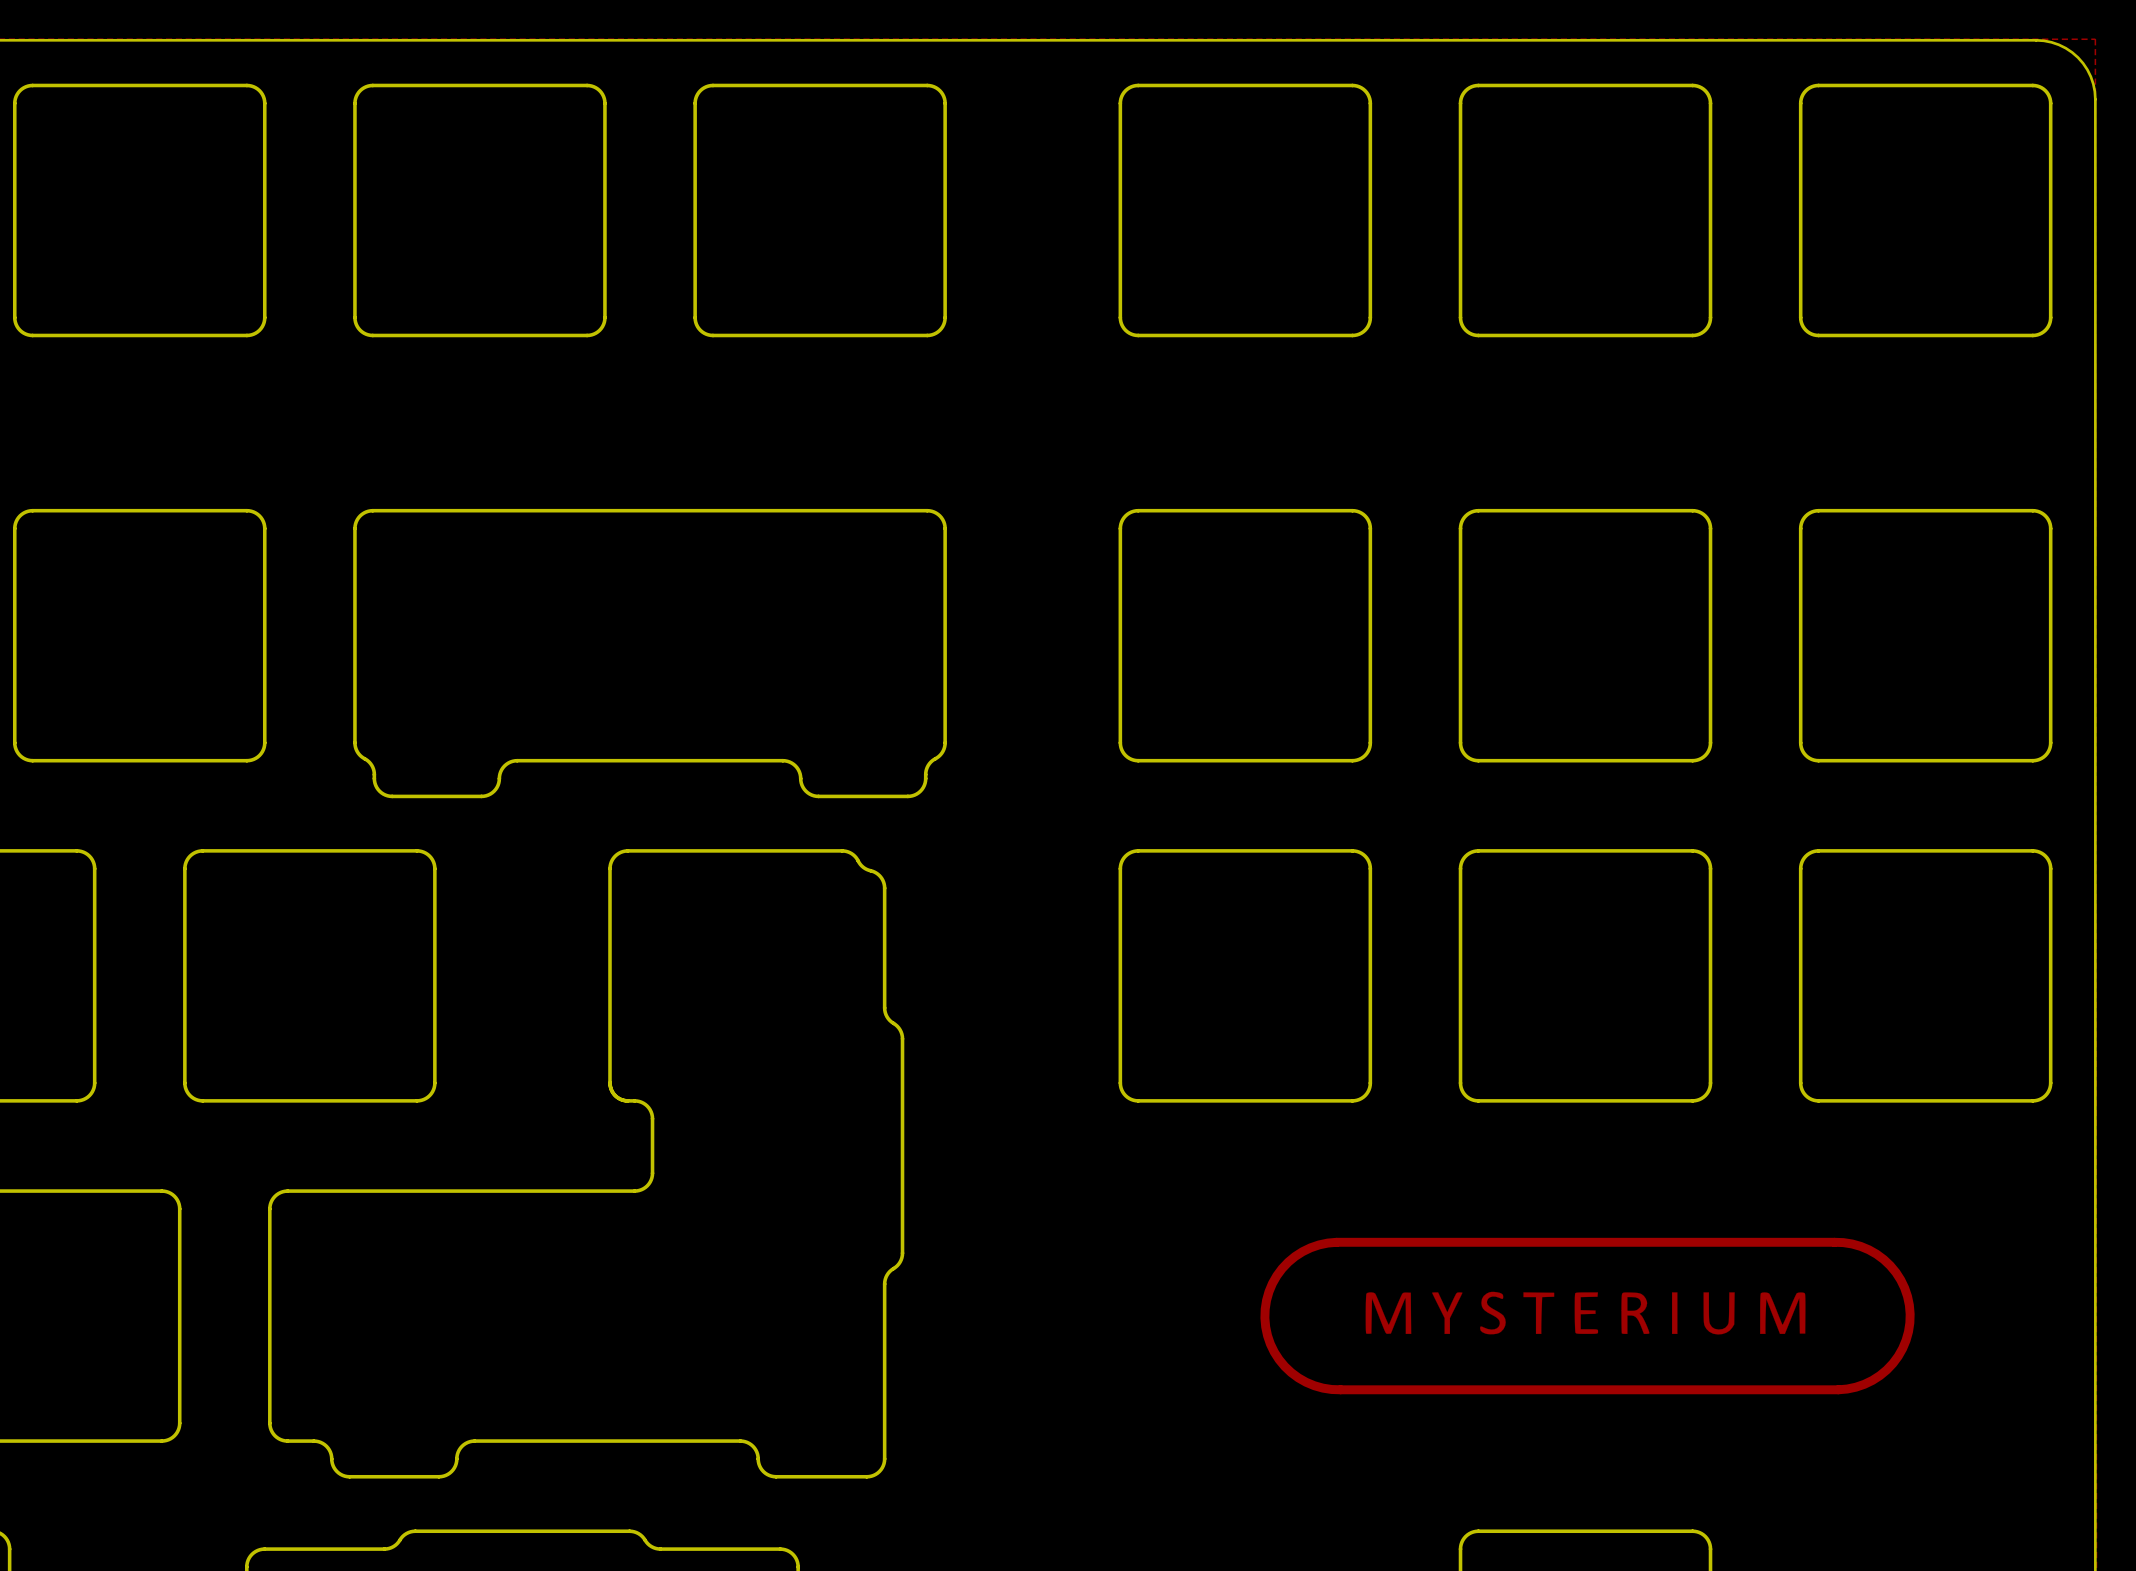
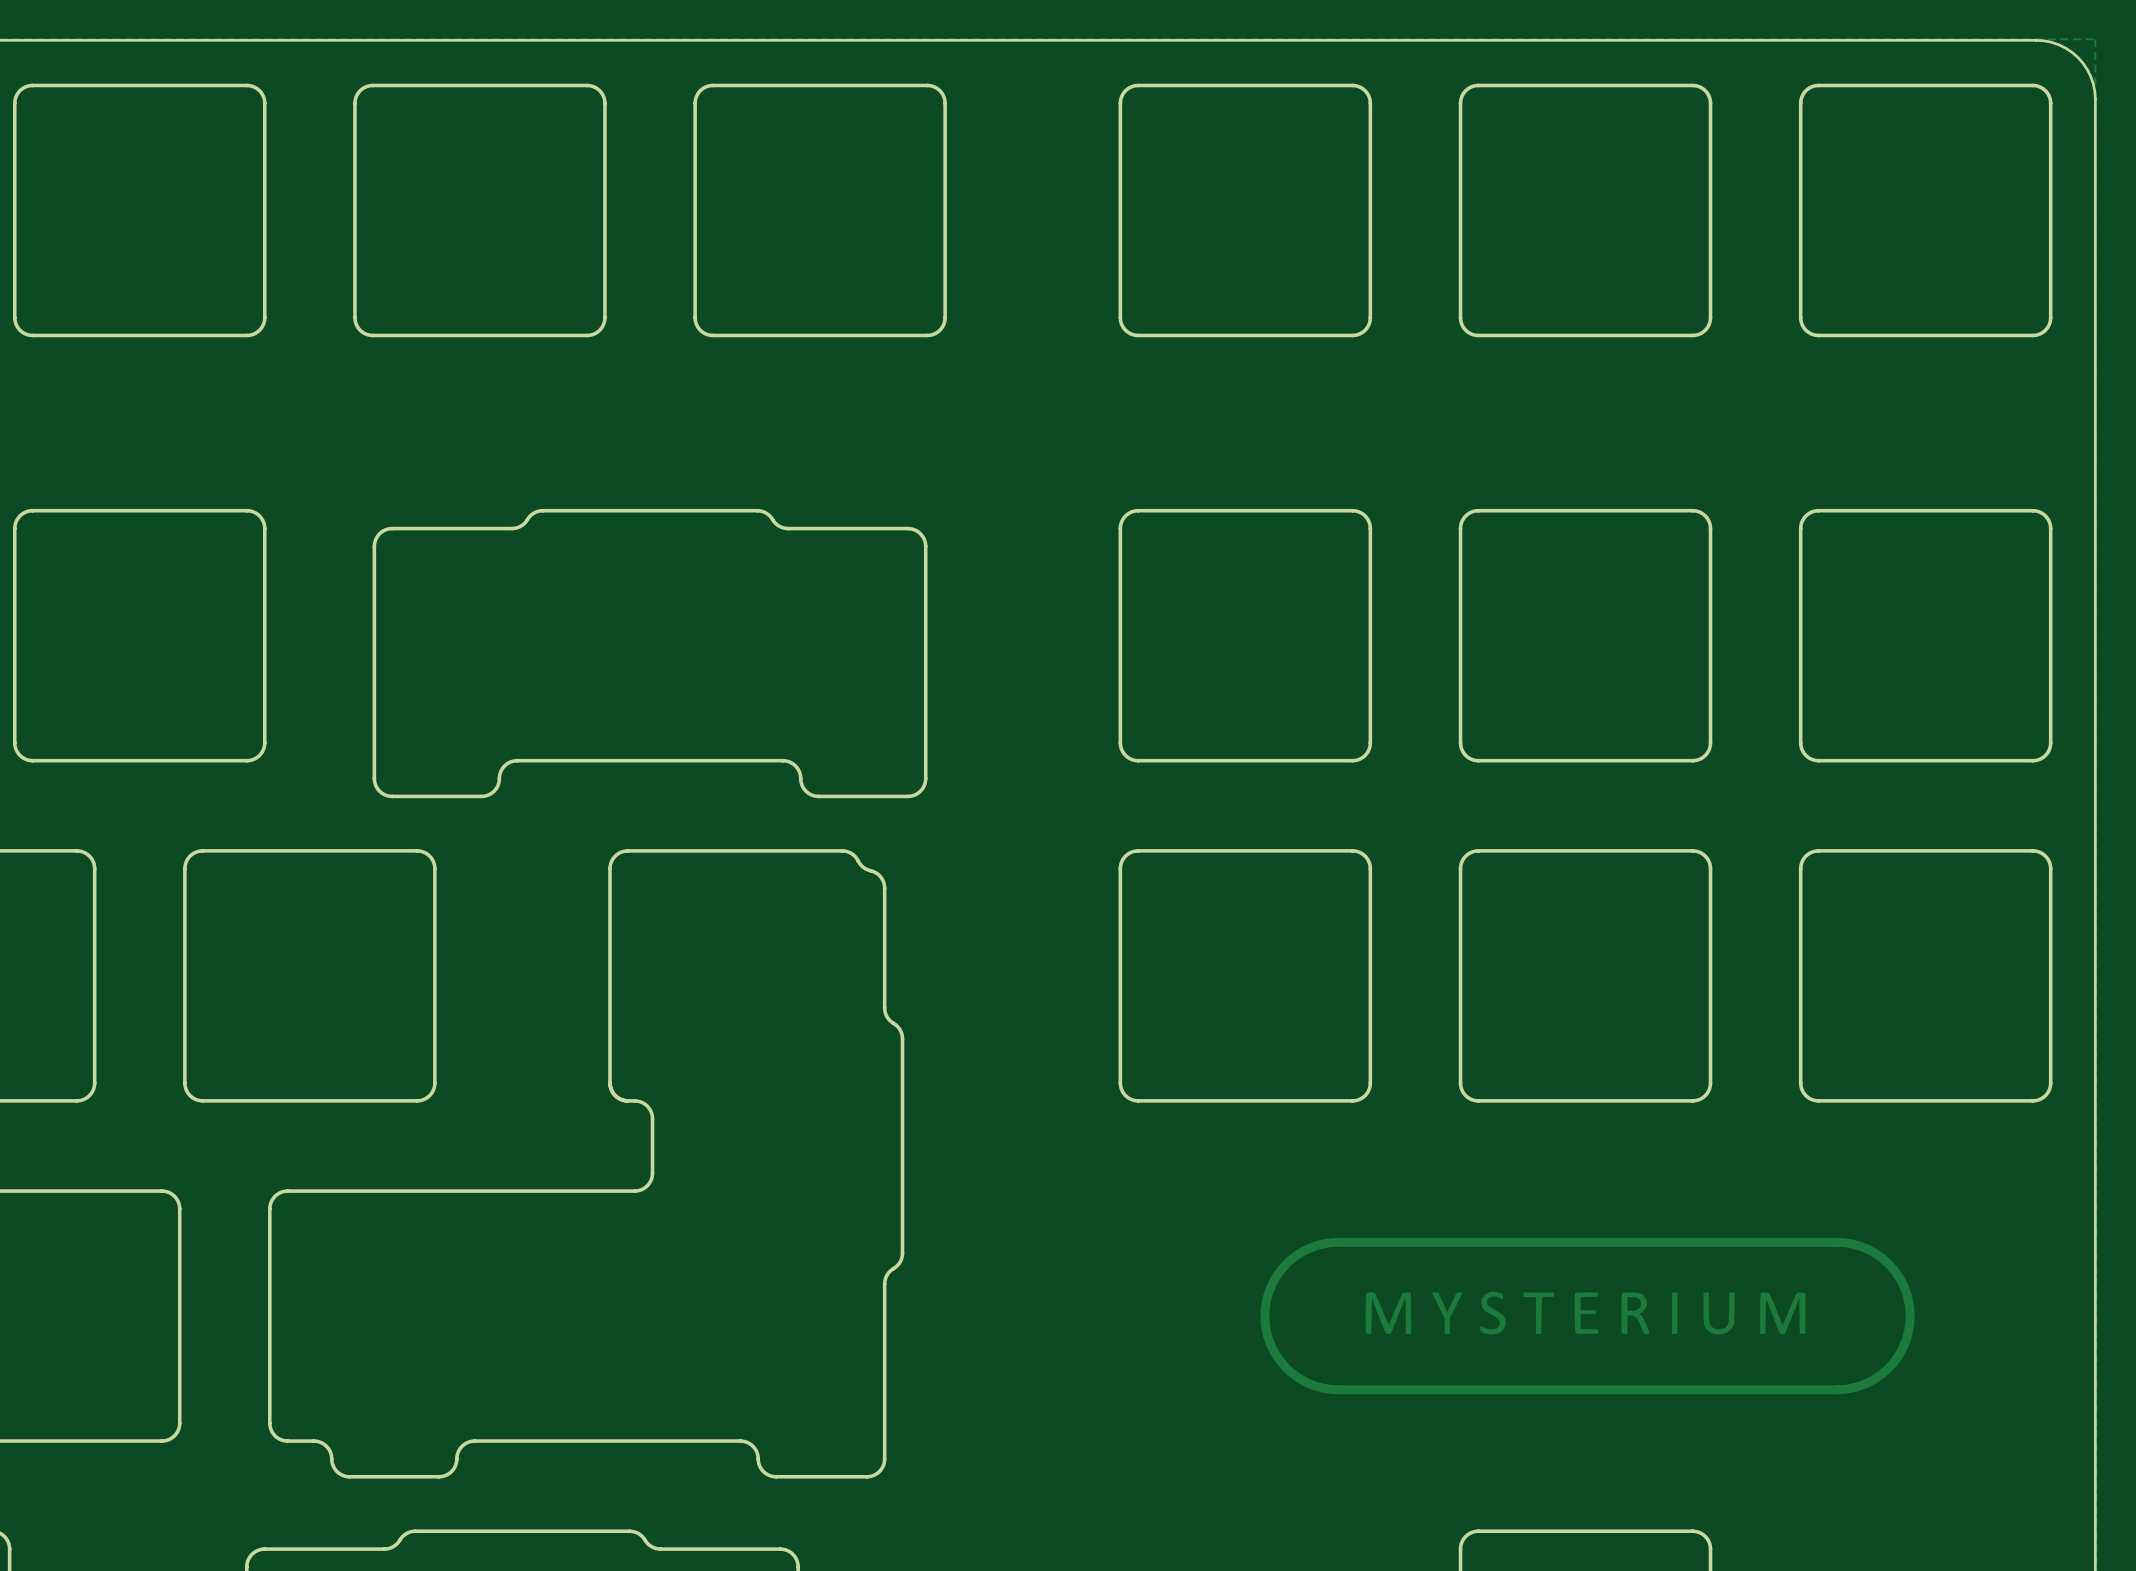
board edge: (372, 510) (360, 515) (355, 526) (354, 742) (358, 753) (371, 765) (374, 774) -> (542, 510) (533, 513) (522, 524) (514, 528) (389, 528) (381, 532) (376, 537) (374, 546) (374, 774)
board edge: (372, 510) (542, 510) -> none
board edge: (757, 510) (927, 510) -> none
board edge: (927, 510) (939, 515) (944, 526) (945, 742) (941, 753) (928, 765) (925, 778) -> (757, 510) (766, 513) (777, 524) (785, 528) (910, 528) (918, 532) (923, 537) (925, 546) (925, 778)

